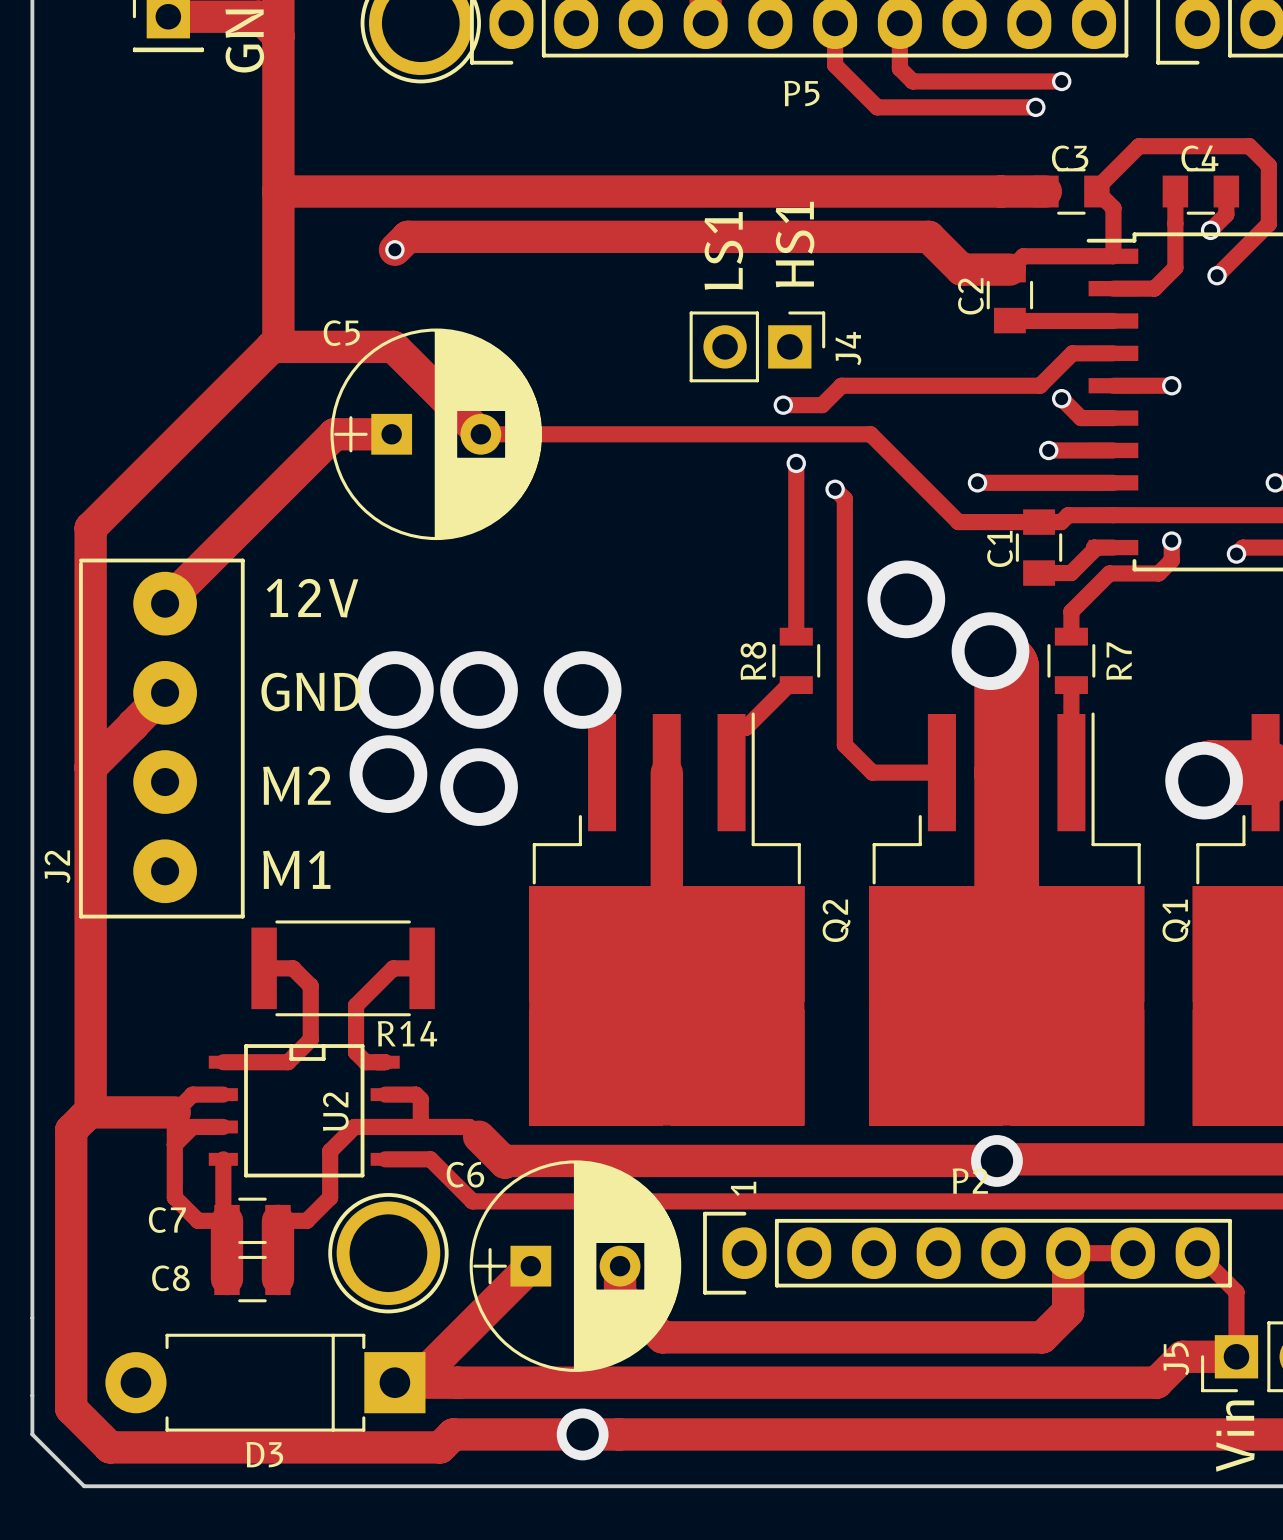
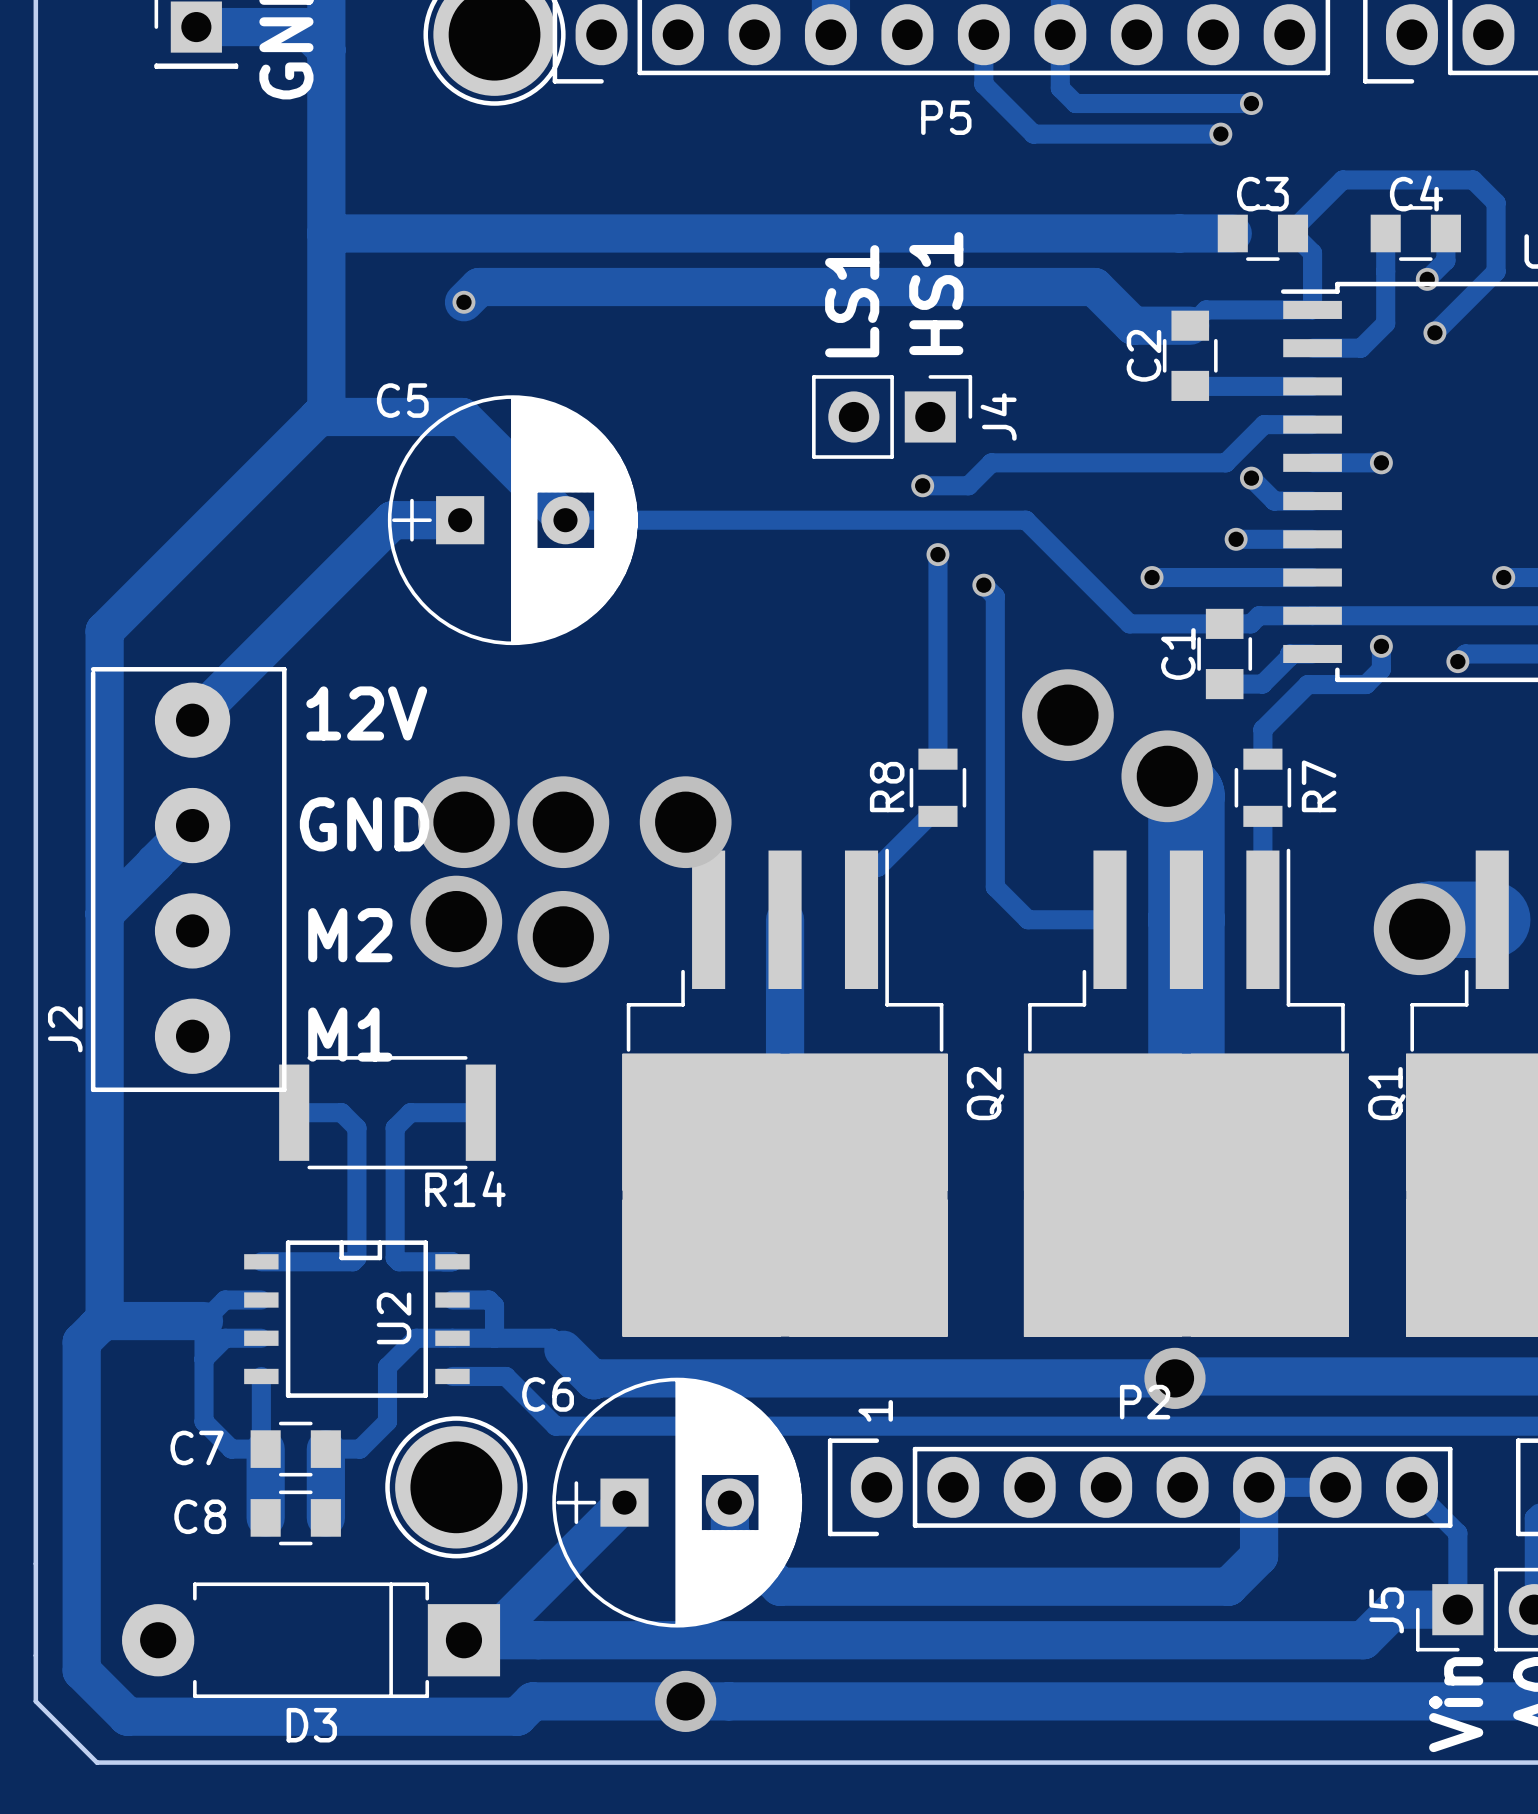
track: (264, 968) (293, 968) (310, 986) (310, 1039) (288, 1062) -> (294, 1112) (341, 1112) (356, 1127) (356, 1257) (353, 1261) (337, 1261)
R14 position: (343, 968) -> (387, 1112)
track: (422, 968) (393, 968) (356, 1005) (356, 1052) (365, 1062) -> (480, 1112) (410, 1112) (395, 1127) (395, 1257) (398, 1261) (429, 1261)

